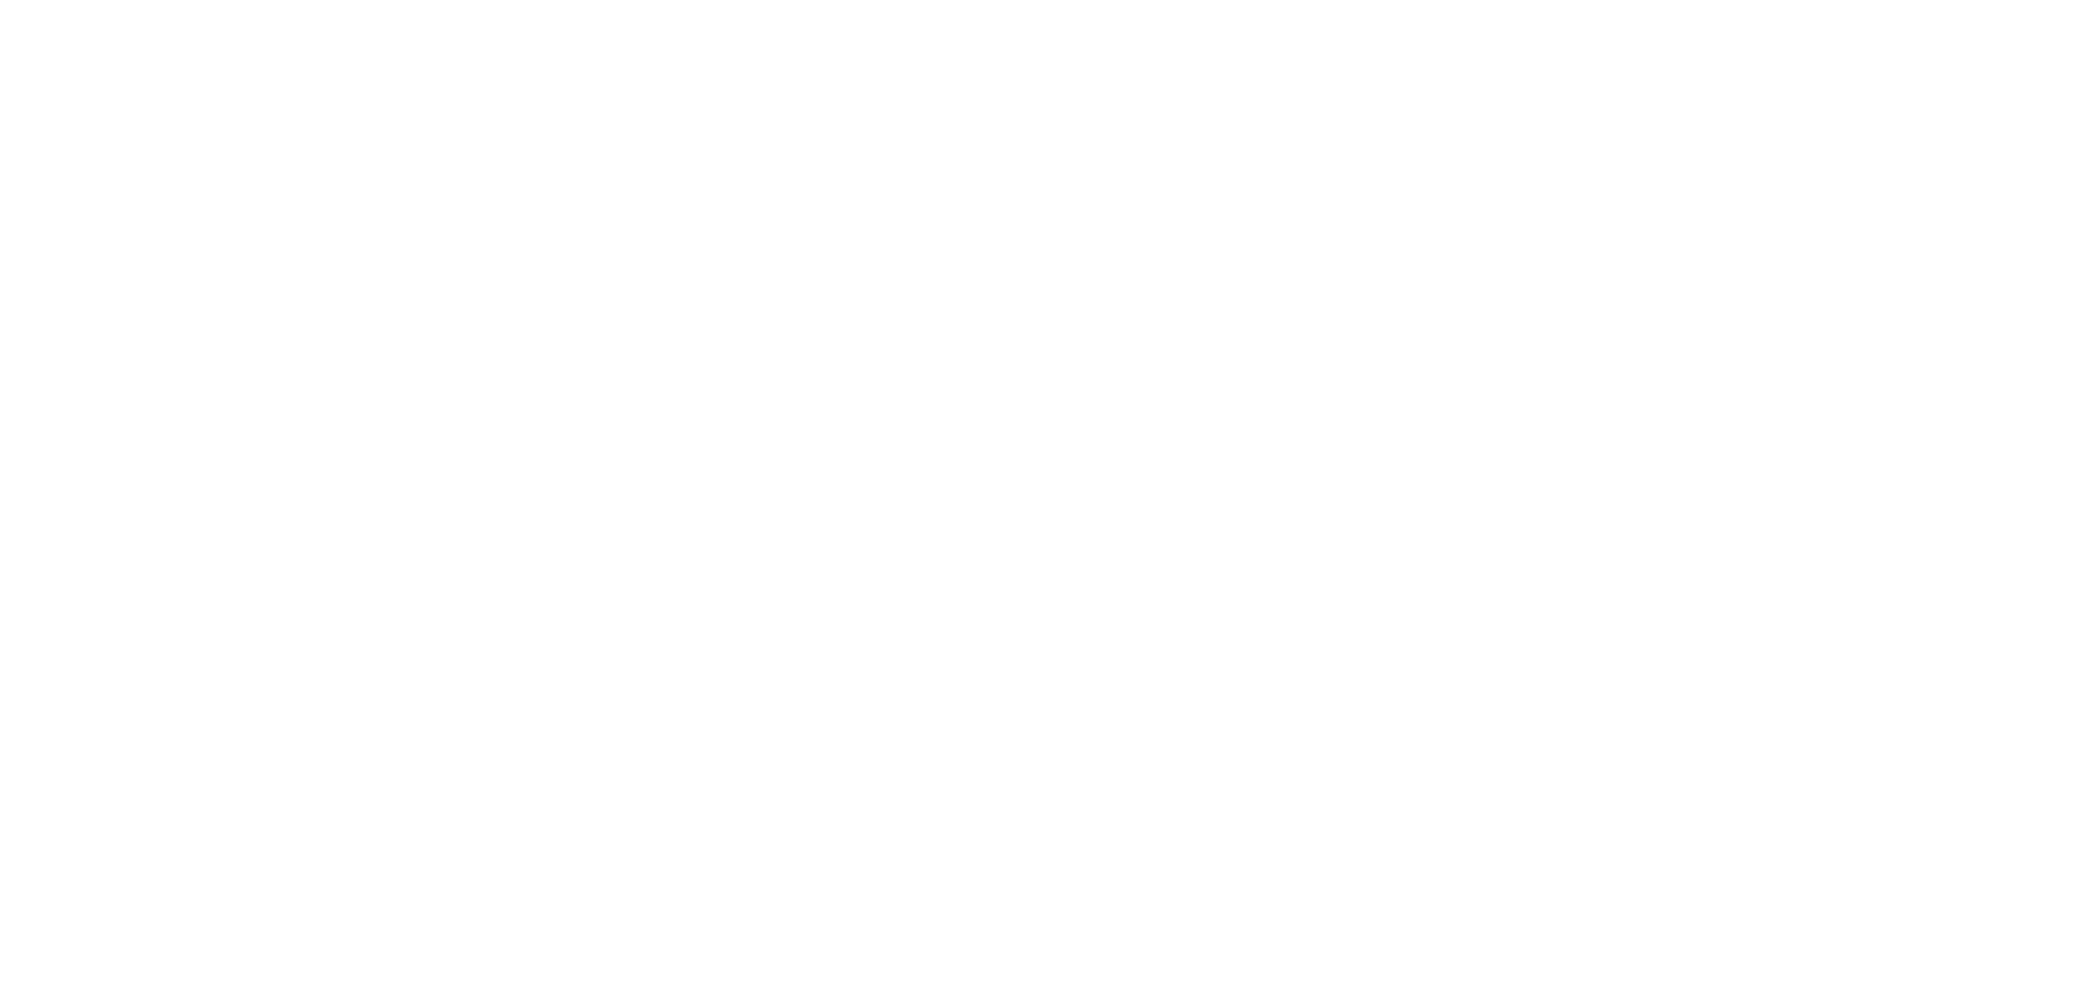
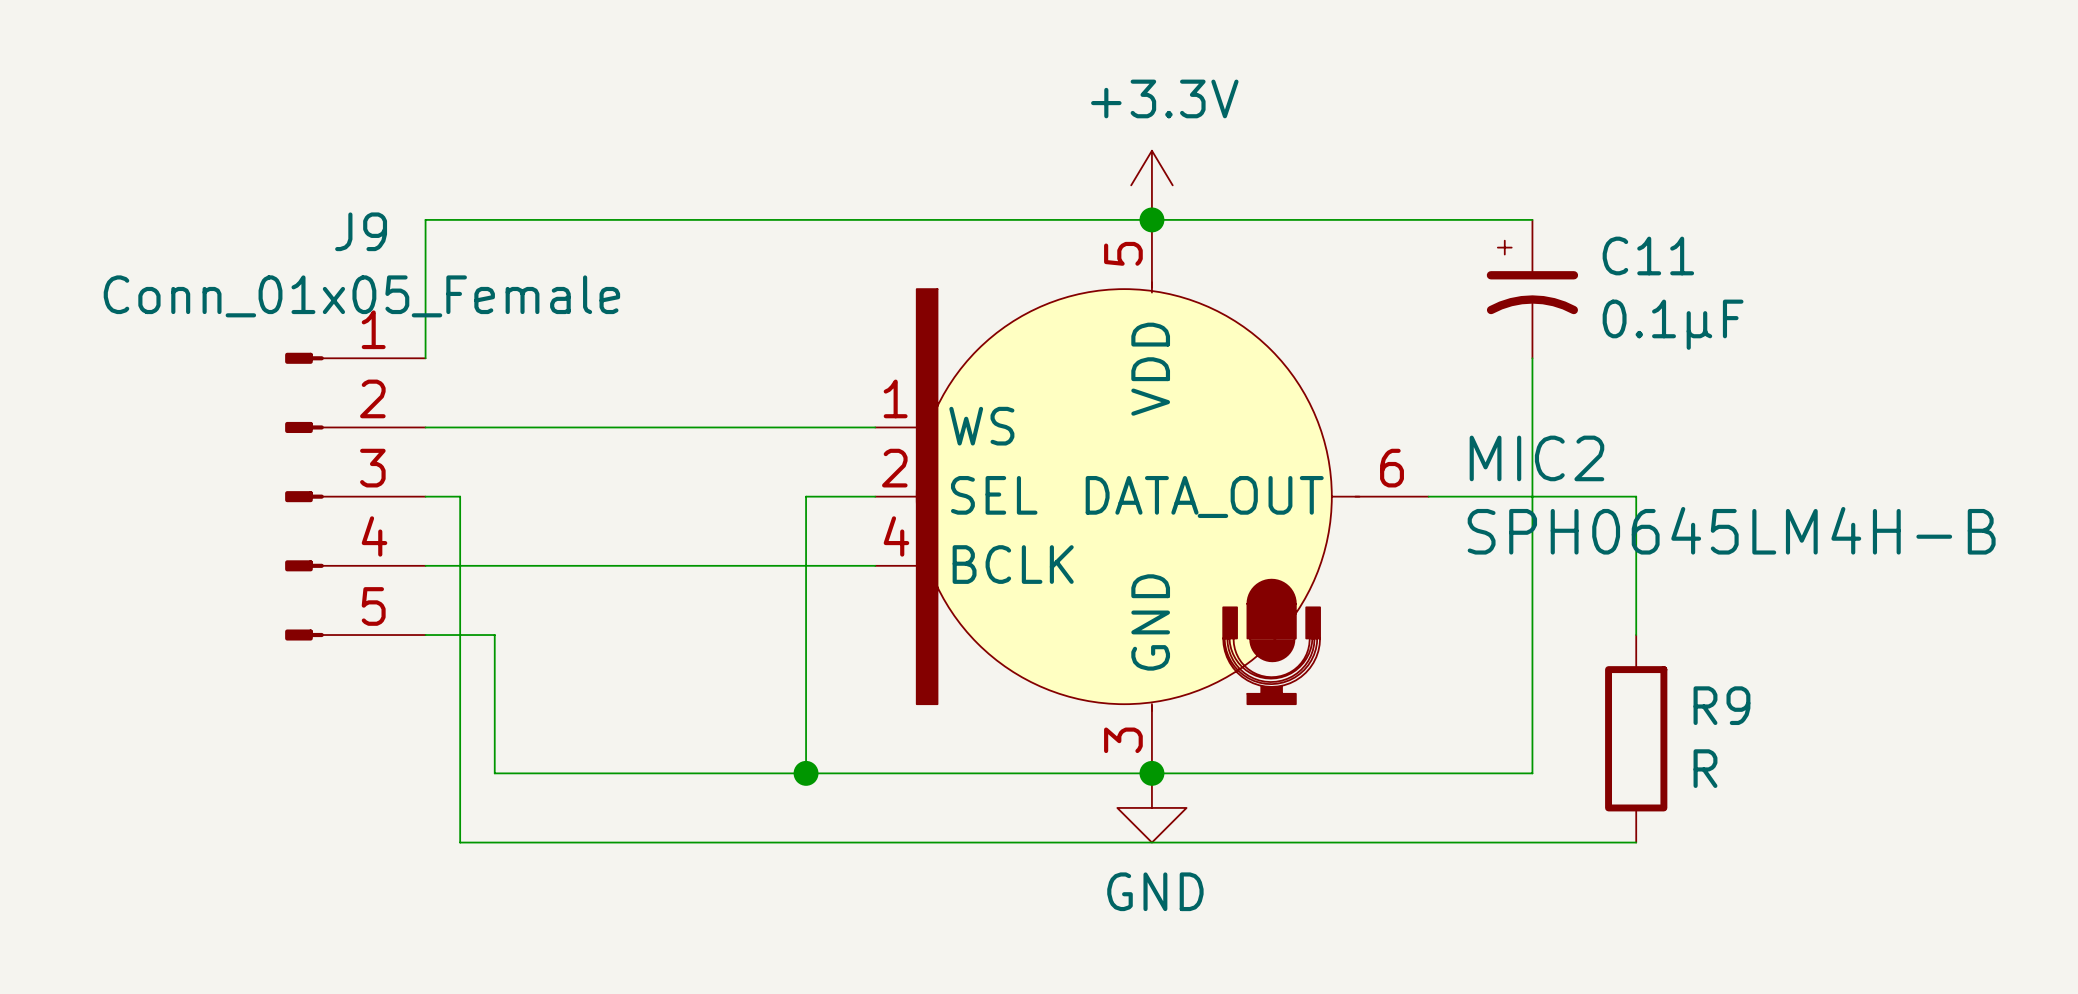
power symbol: none -> +3.3V (1151, 185)
junction: none -> (1151, 219)
wire: none -> (1532, 219) (425, 219) (425, 358)
C11: none -> 0.1μF (1532, 289)
wire: none -> (1532, 358) (1532, 773) (494, 773) (494, 635) (425, 635)
wire: none -> (425, 427) (875, 427)
J9: none -> Conn_01x05_Female (355, 496)
wire: none -> (425, 496) (460, 496) (460, 842) (1636, 842)
wire: none -> (875, 496) (806, 496) (806, 773)
MIC2: none -> SPH0645LM4H-B (1151, 496)
wire: none -> (1428, 496) (1636, 496) (1636, 635)
wire: none -> (425, 565) (875, 565)
R9: none -> R (1636, 738)
junction: none -> (806, 773)
junction: none -> (1151, 773)
power symbol: none -> GND (1151, 807)

